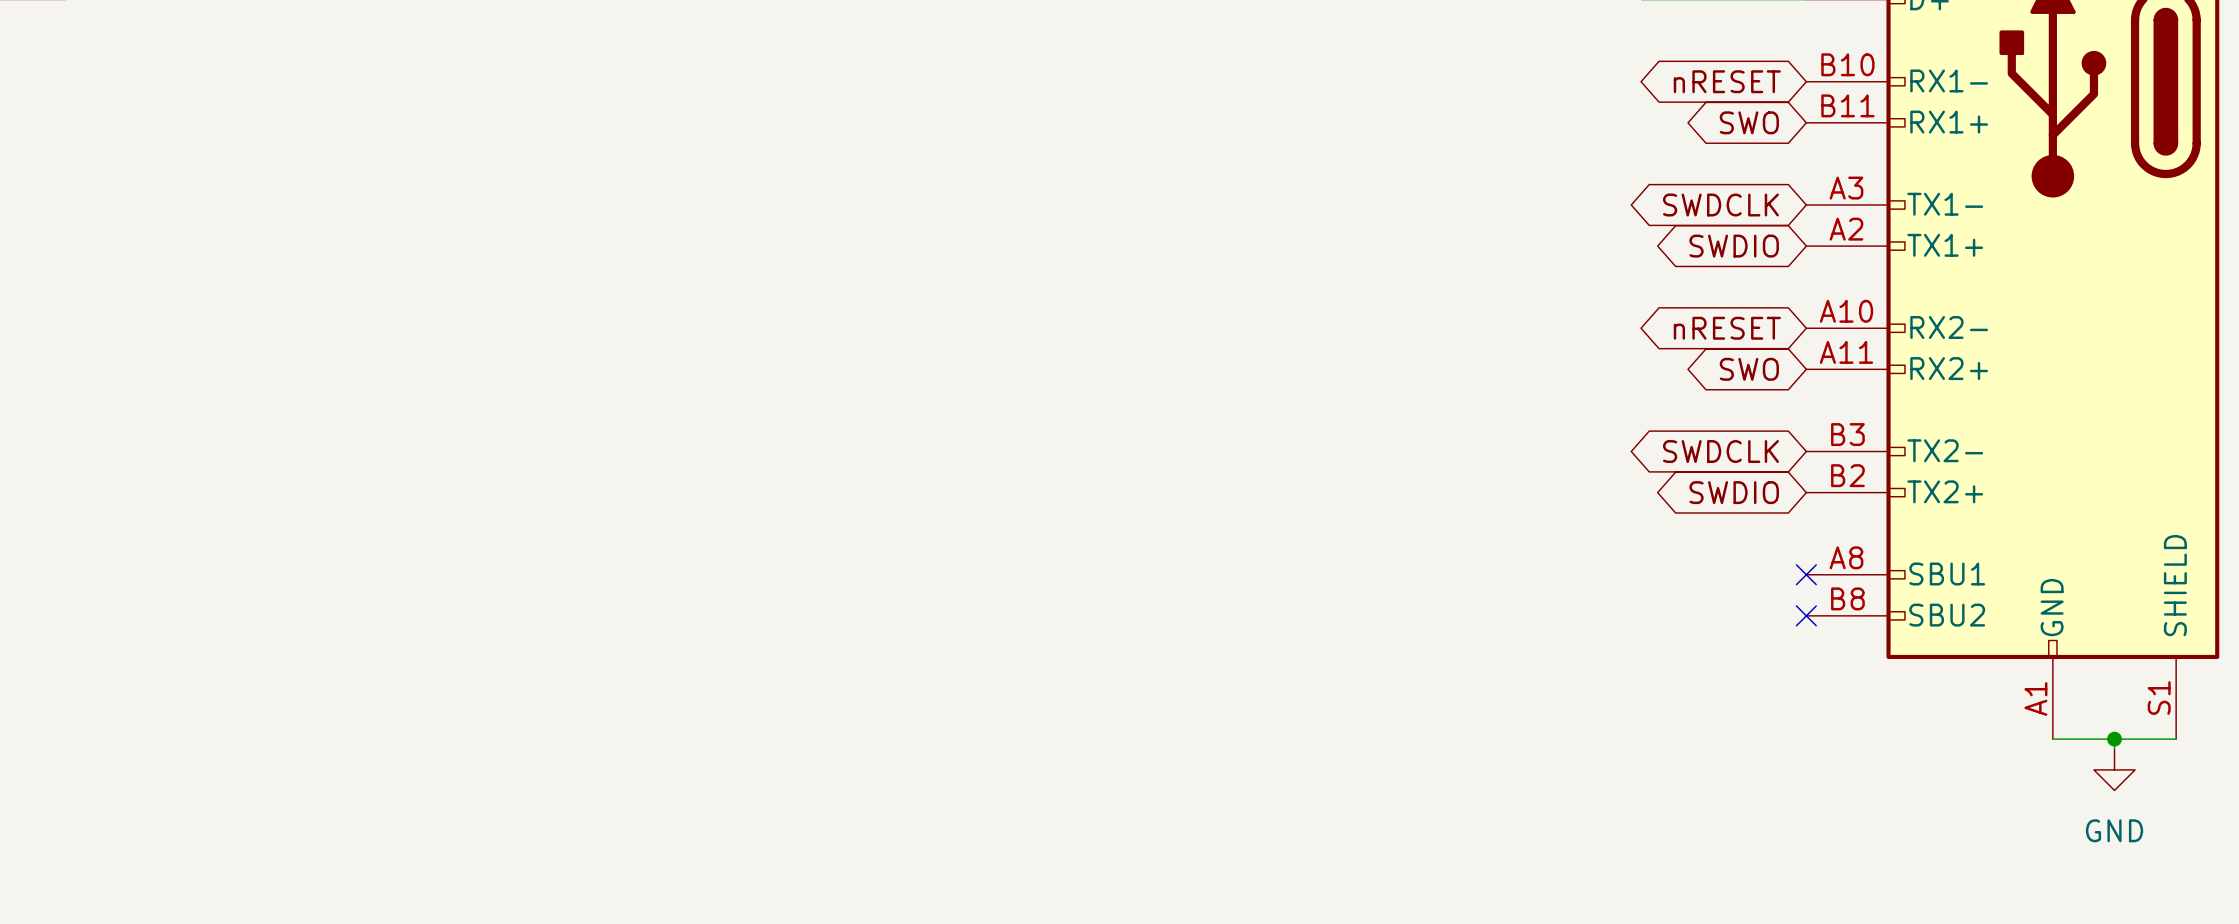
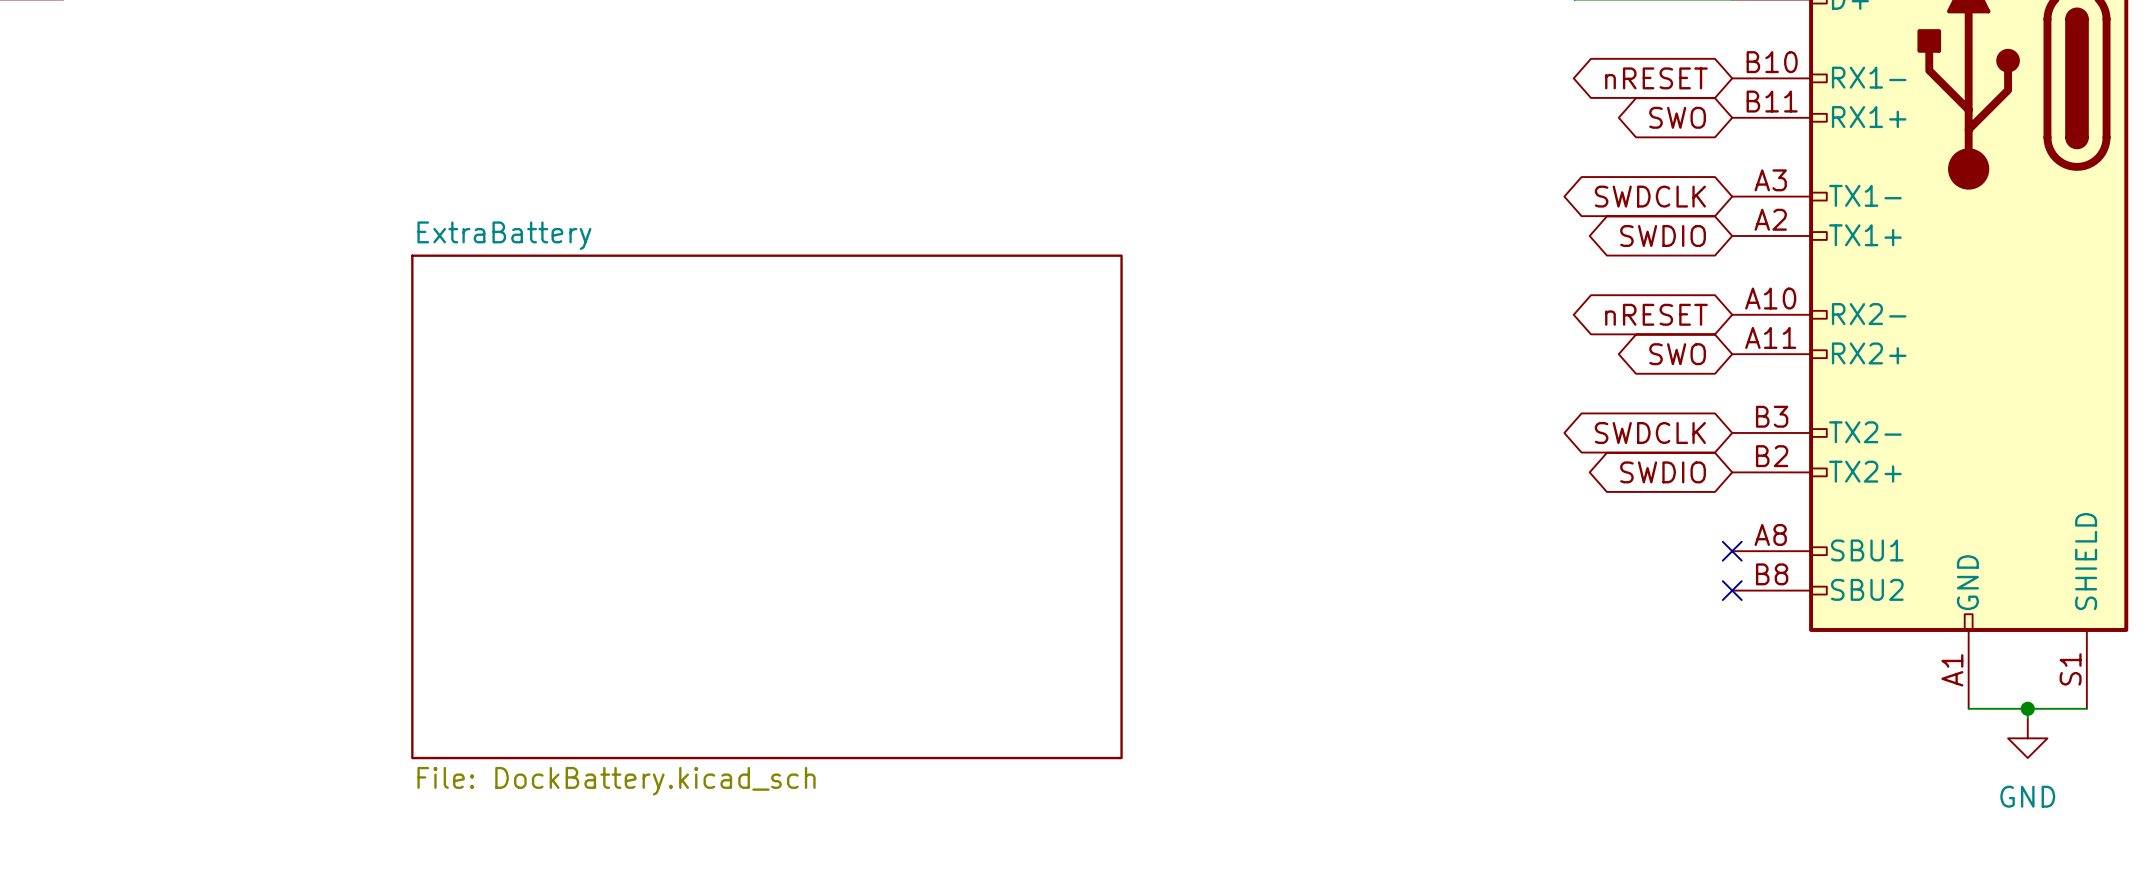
sheet ExtraBattery: none -> File: DockBattery.kicad_sch (766, 506)

